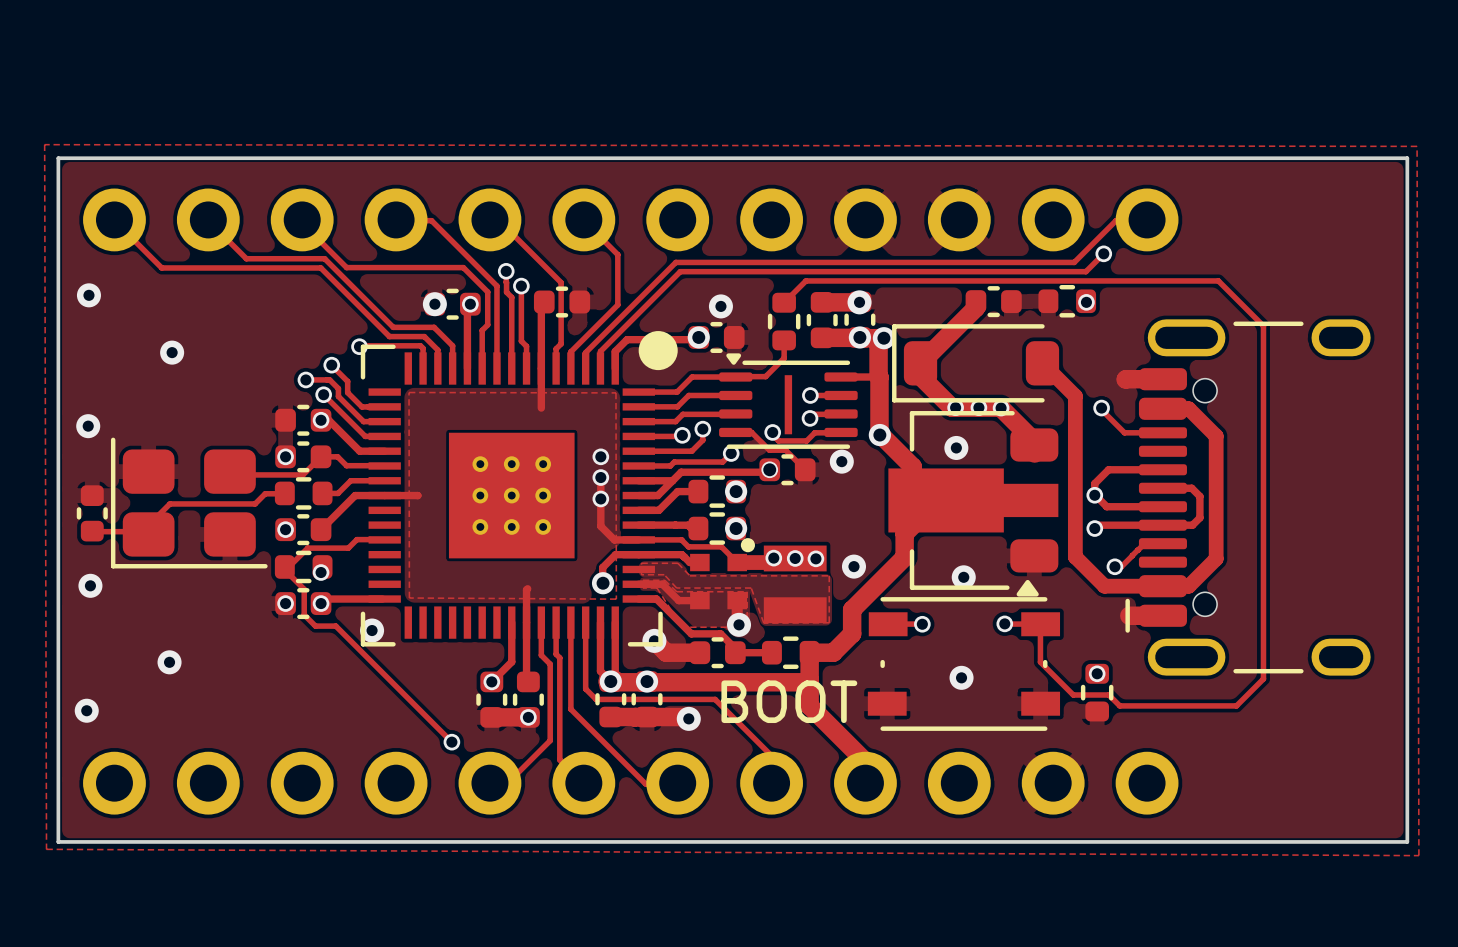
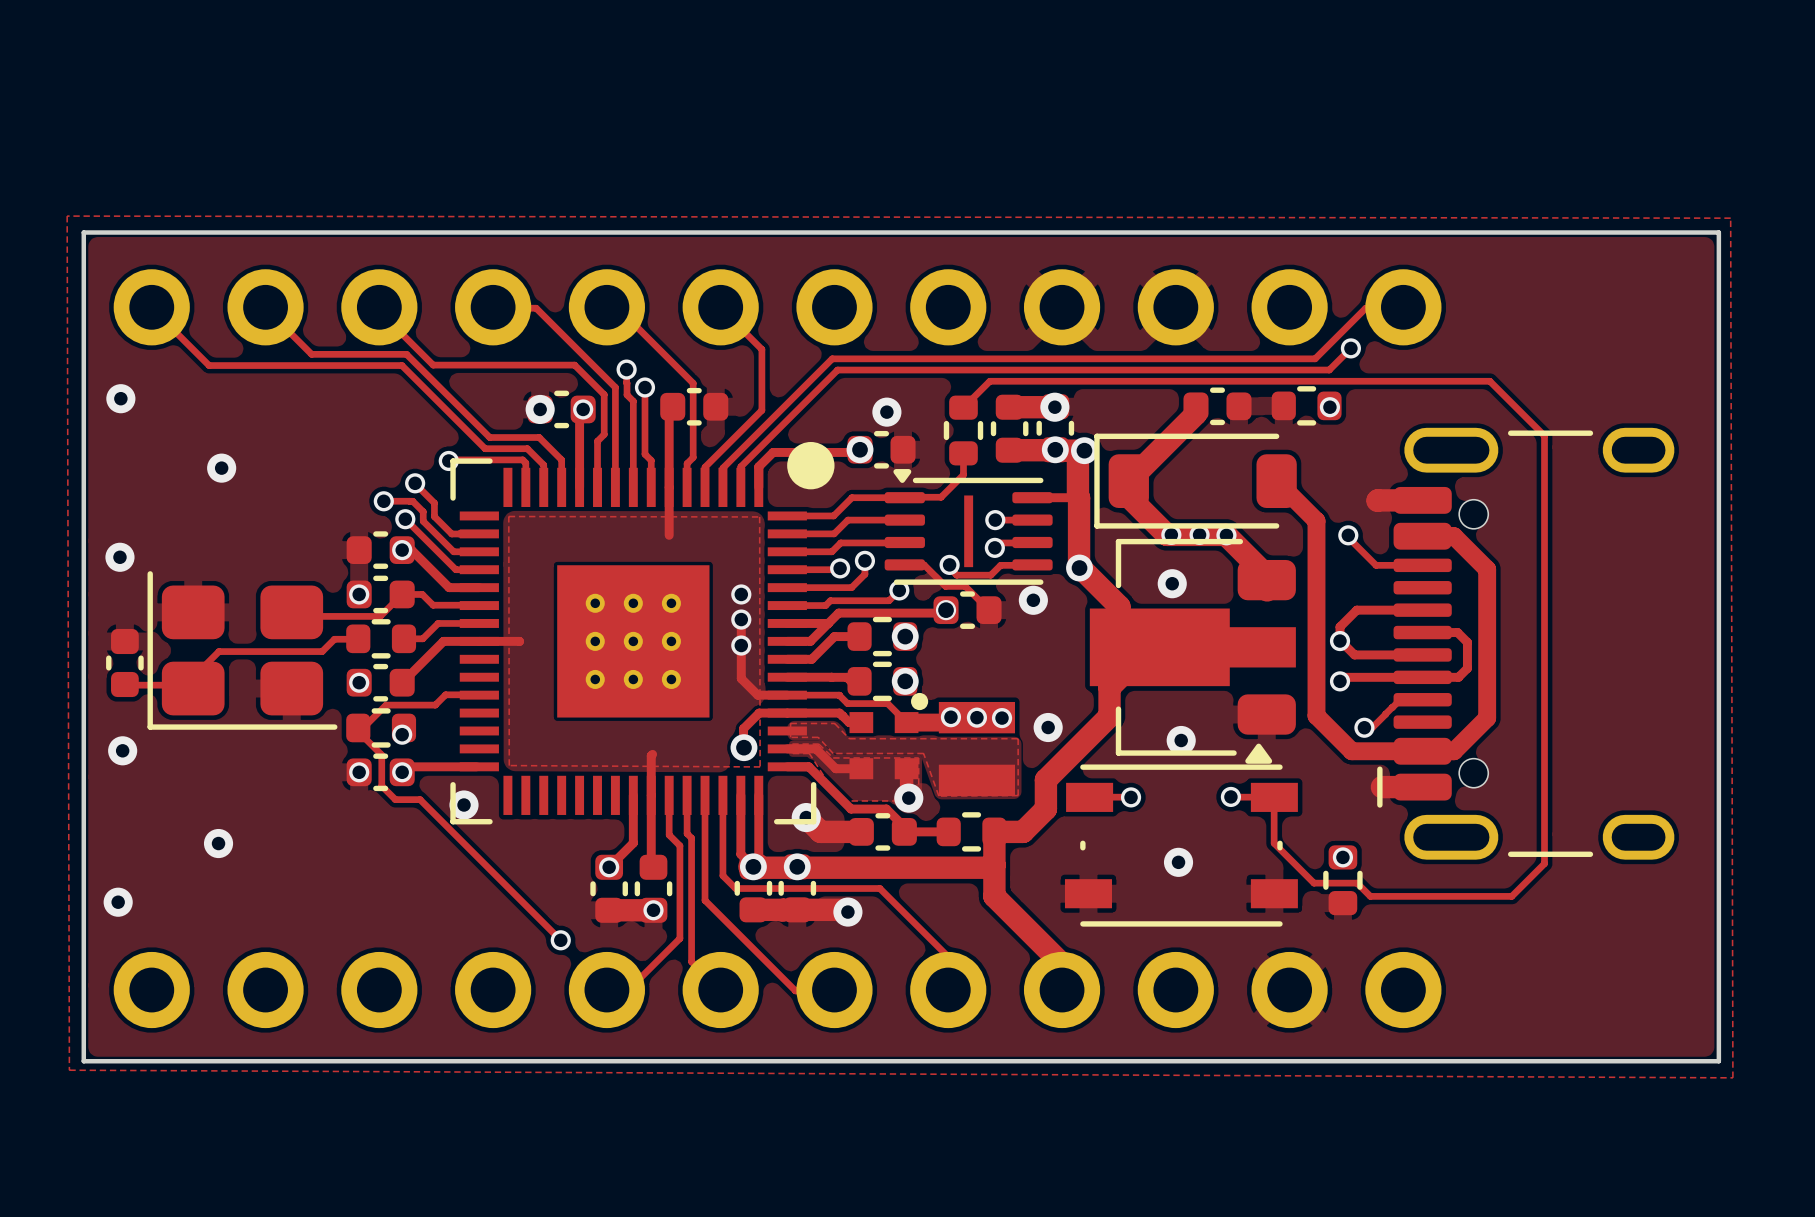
text: BOOT (789, 701) -> none

